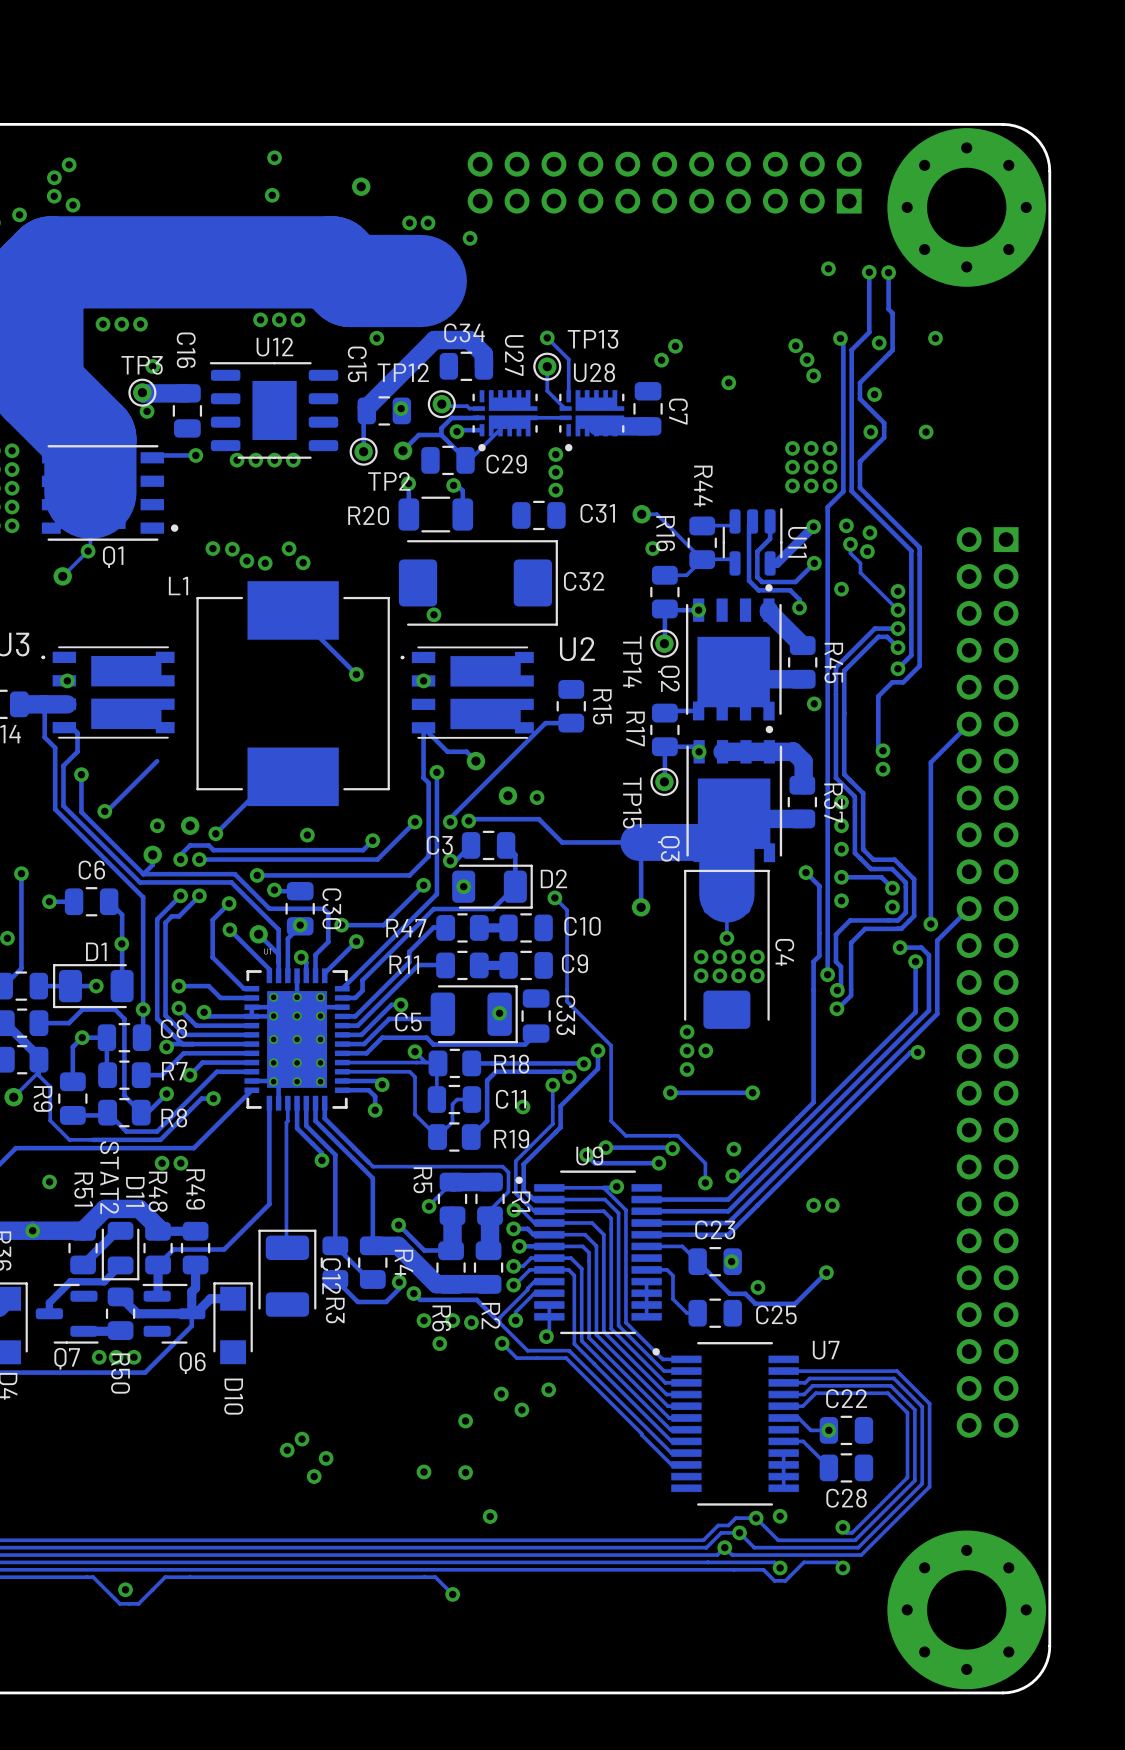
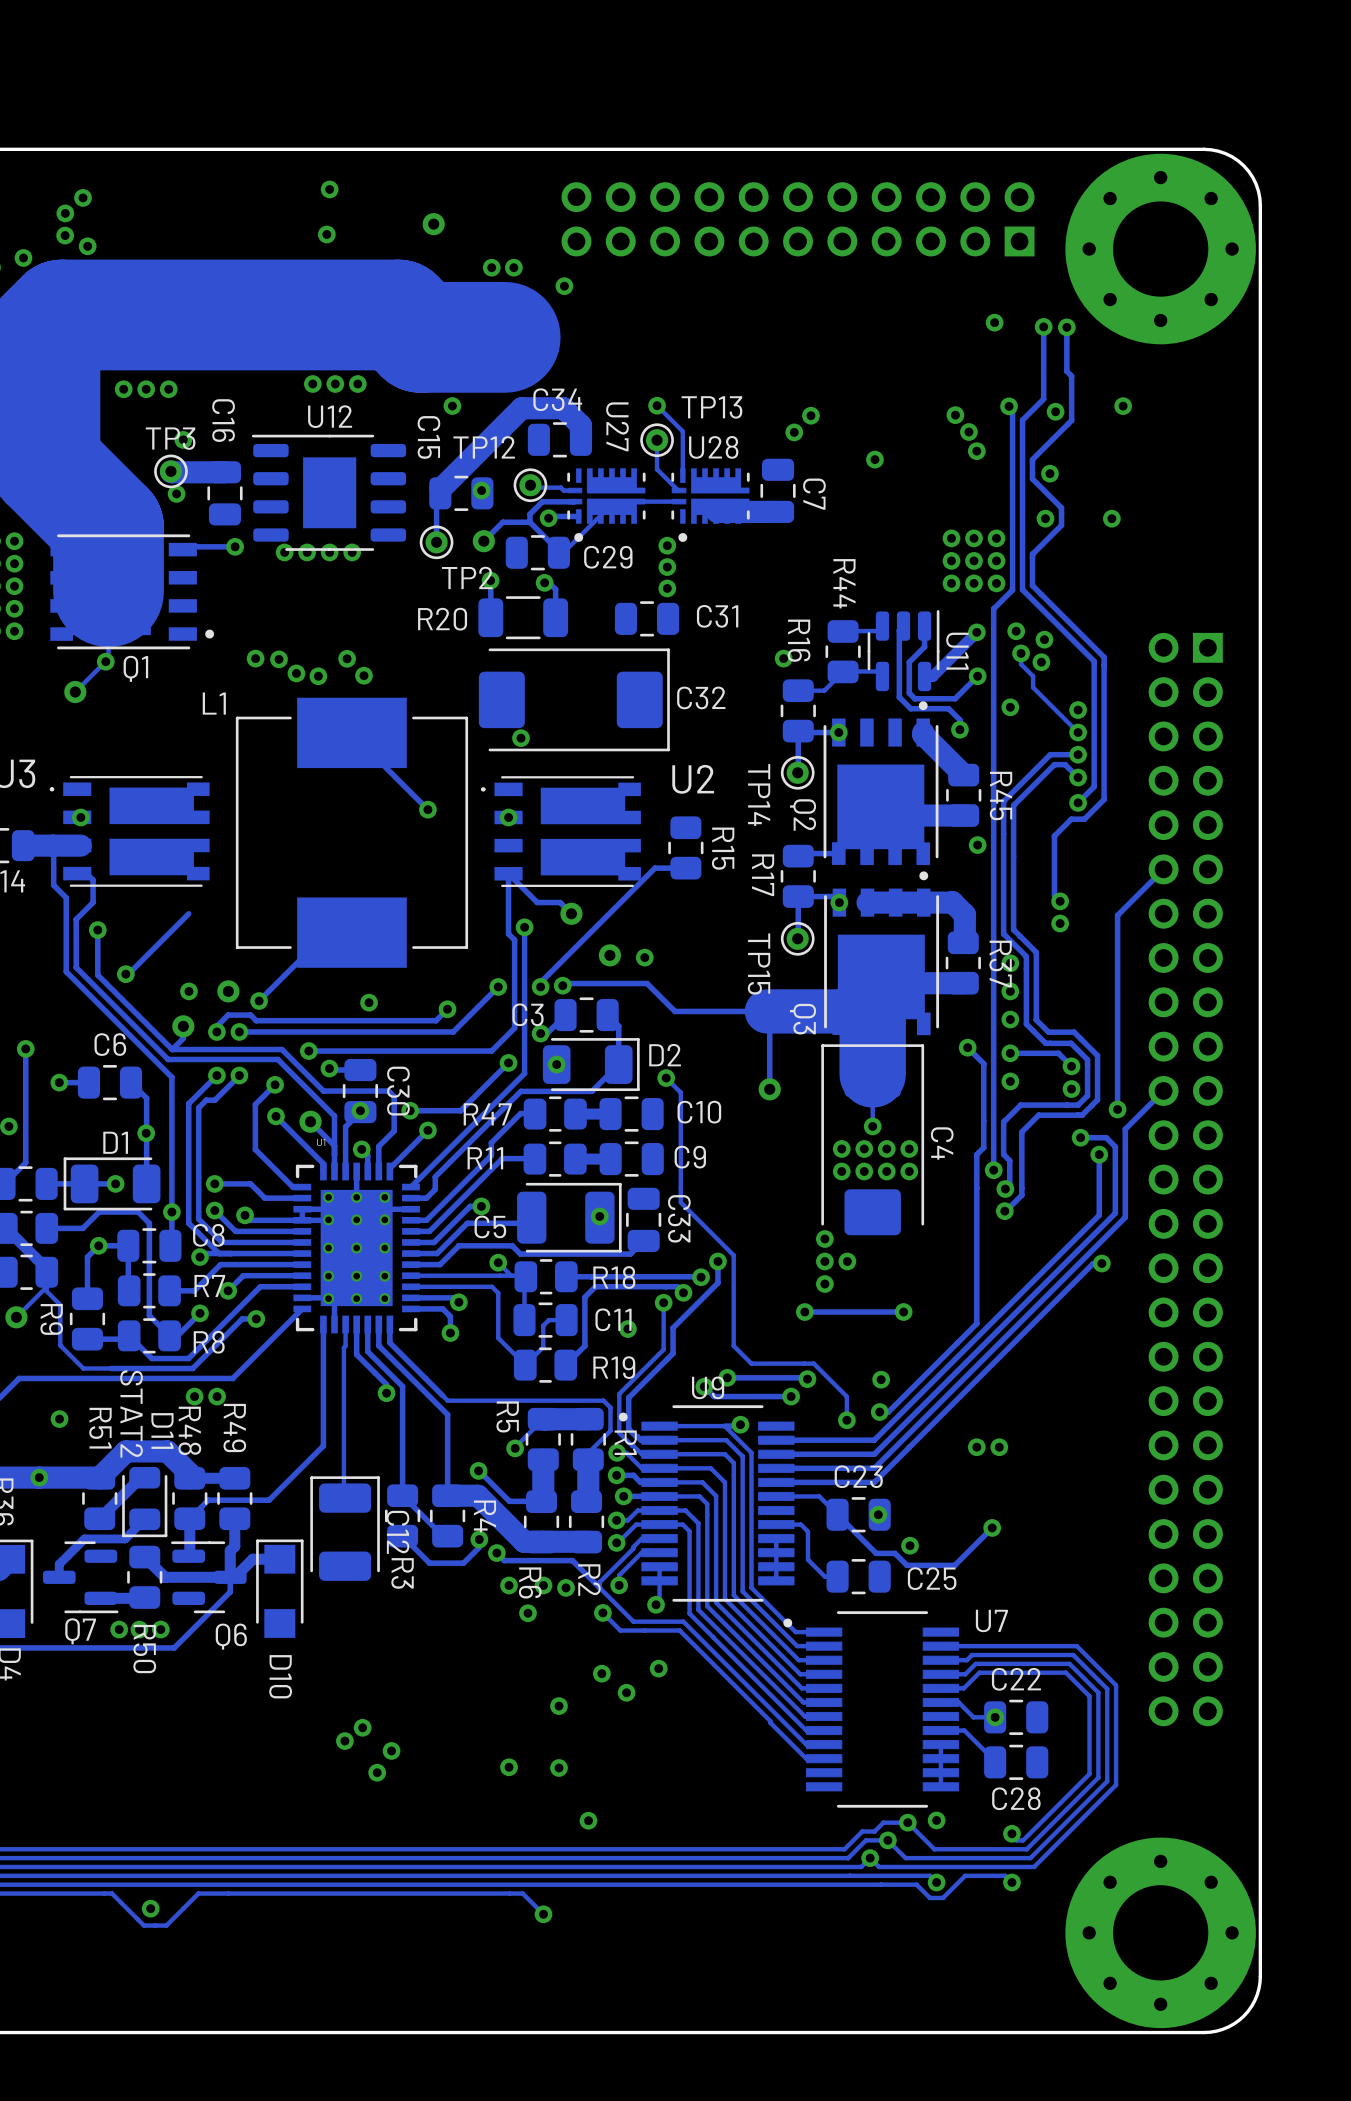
track: (641, 514) (656, 514) (702, 559) -> none
part: (641, 514) -> none

